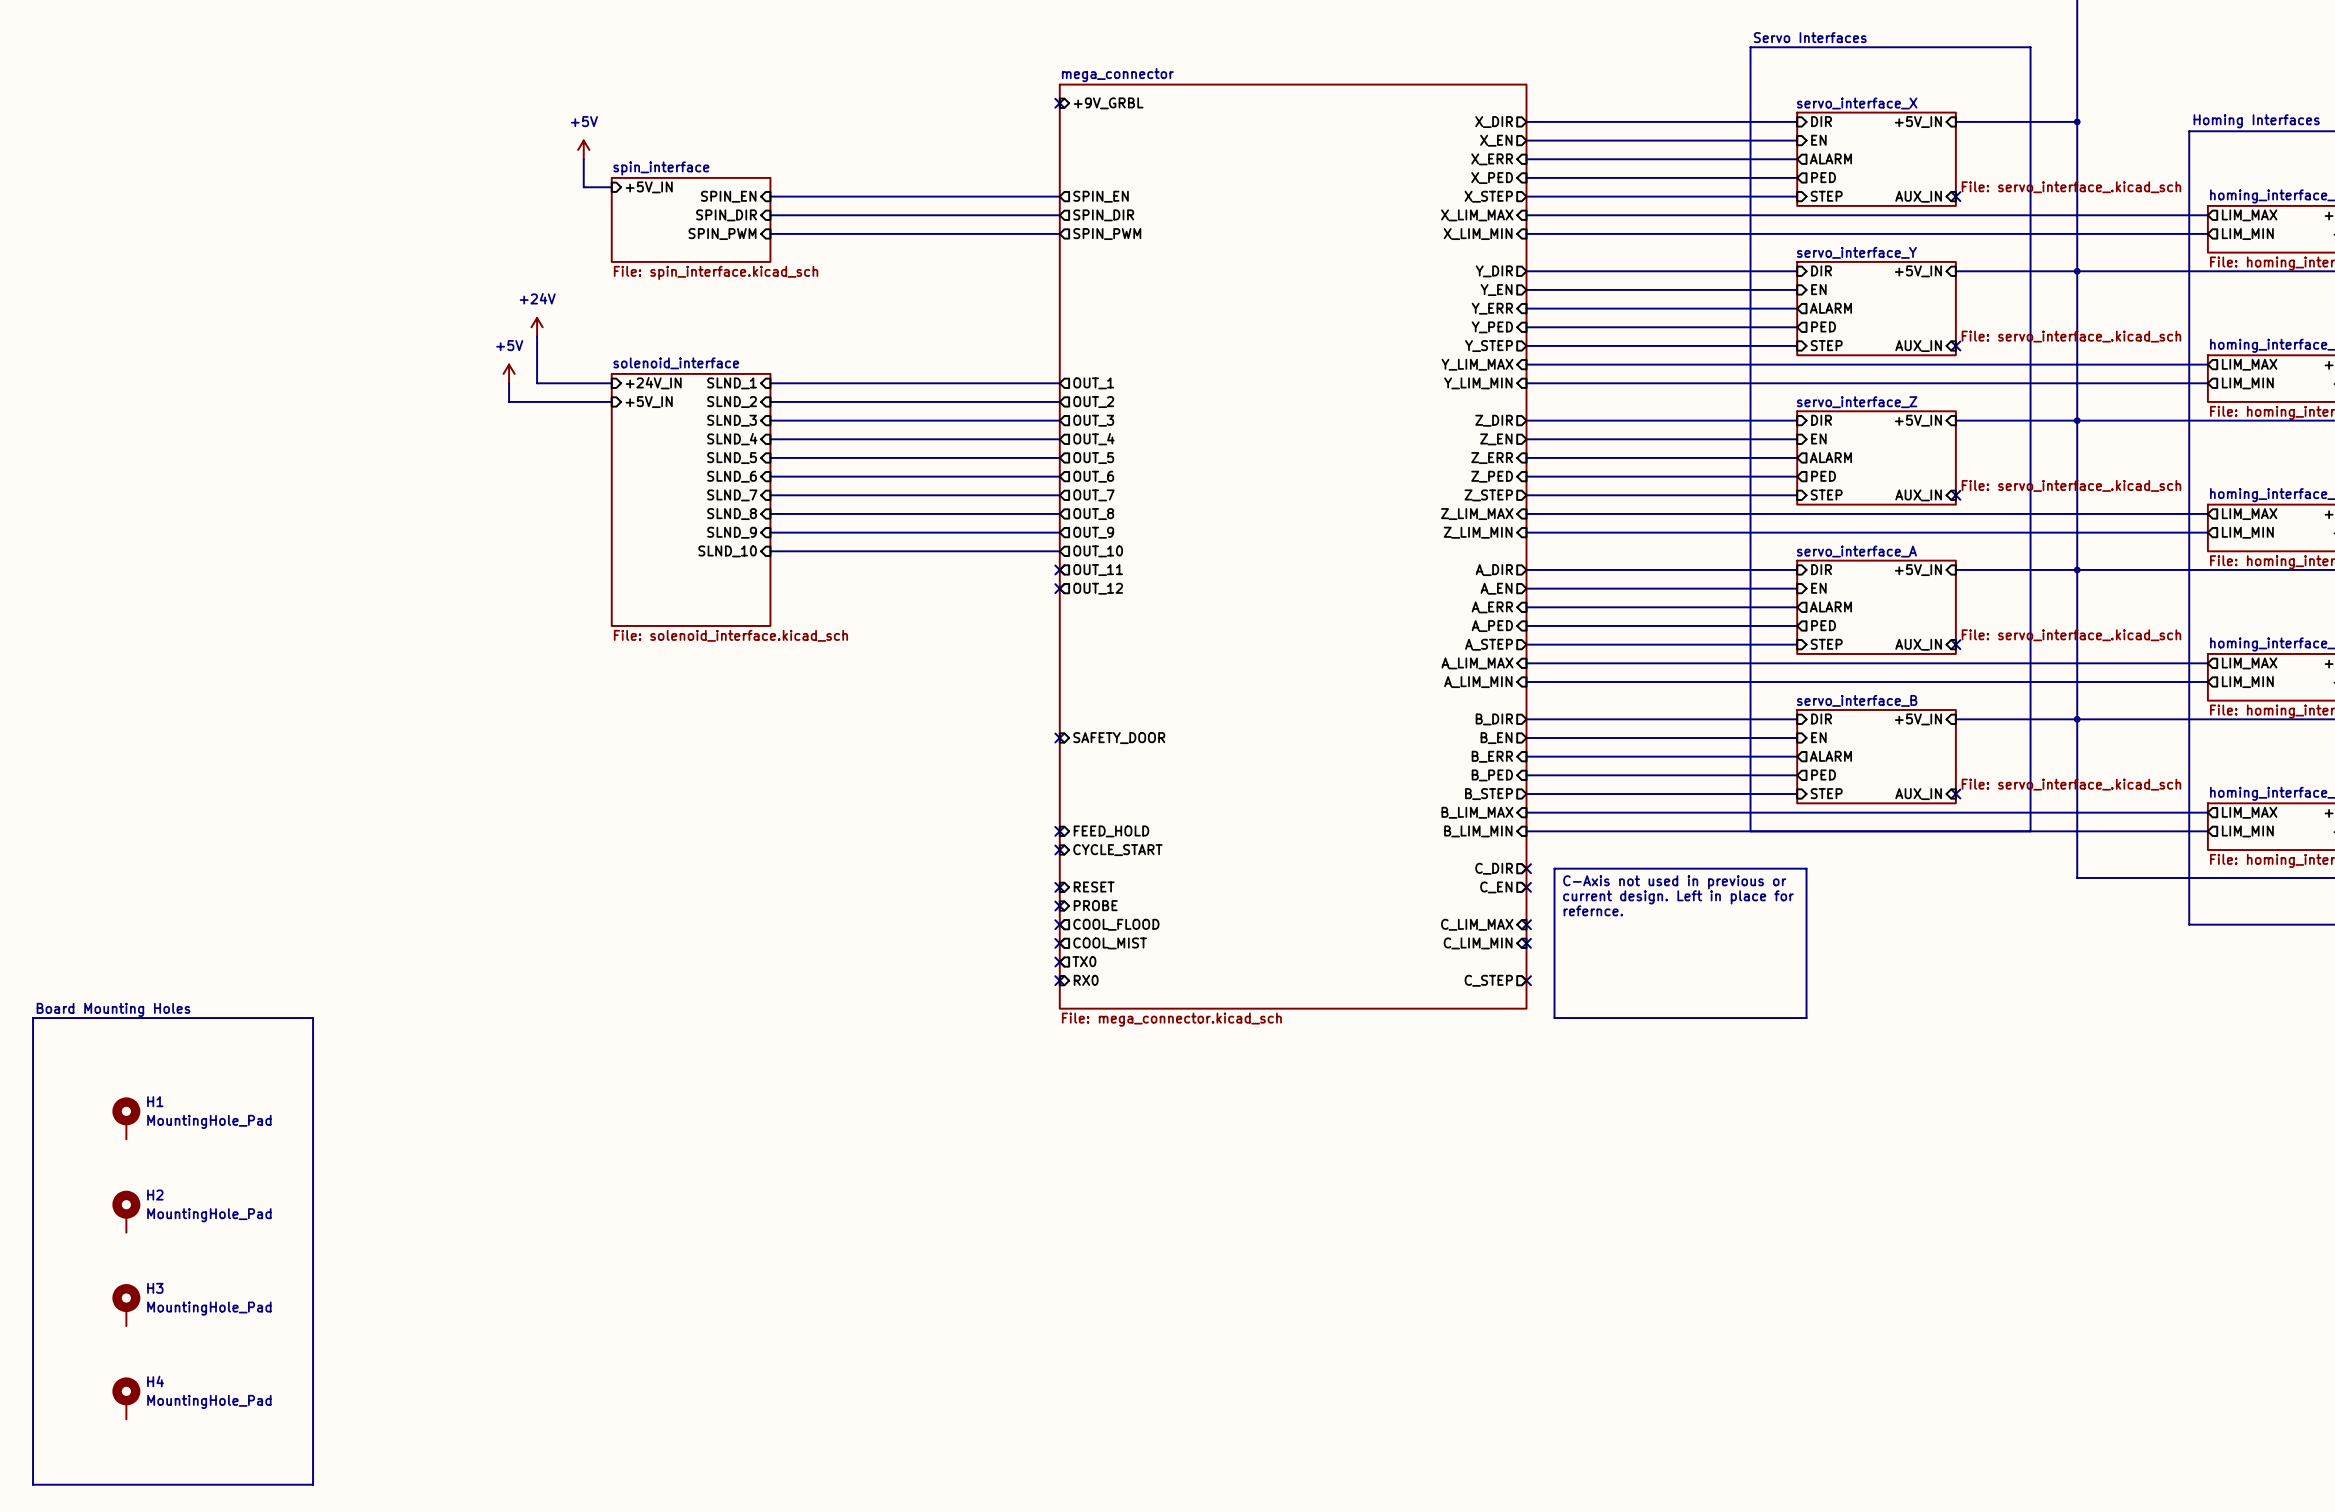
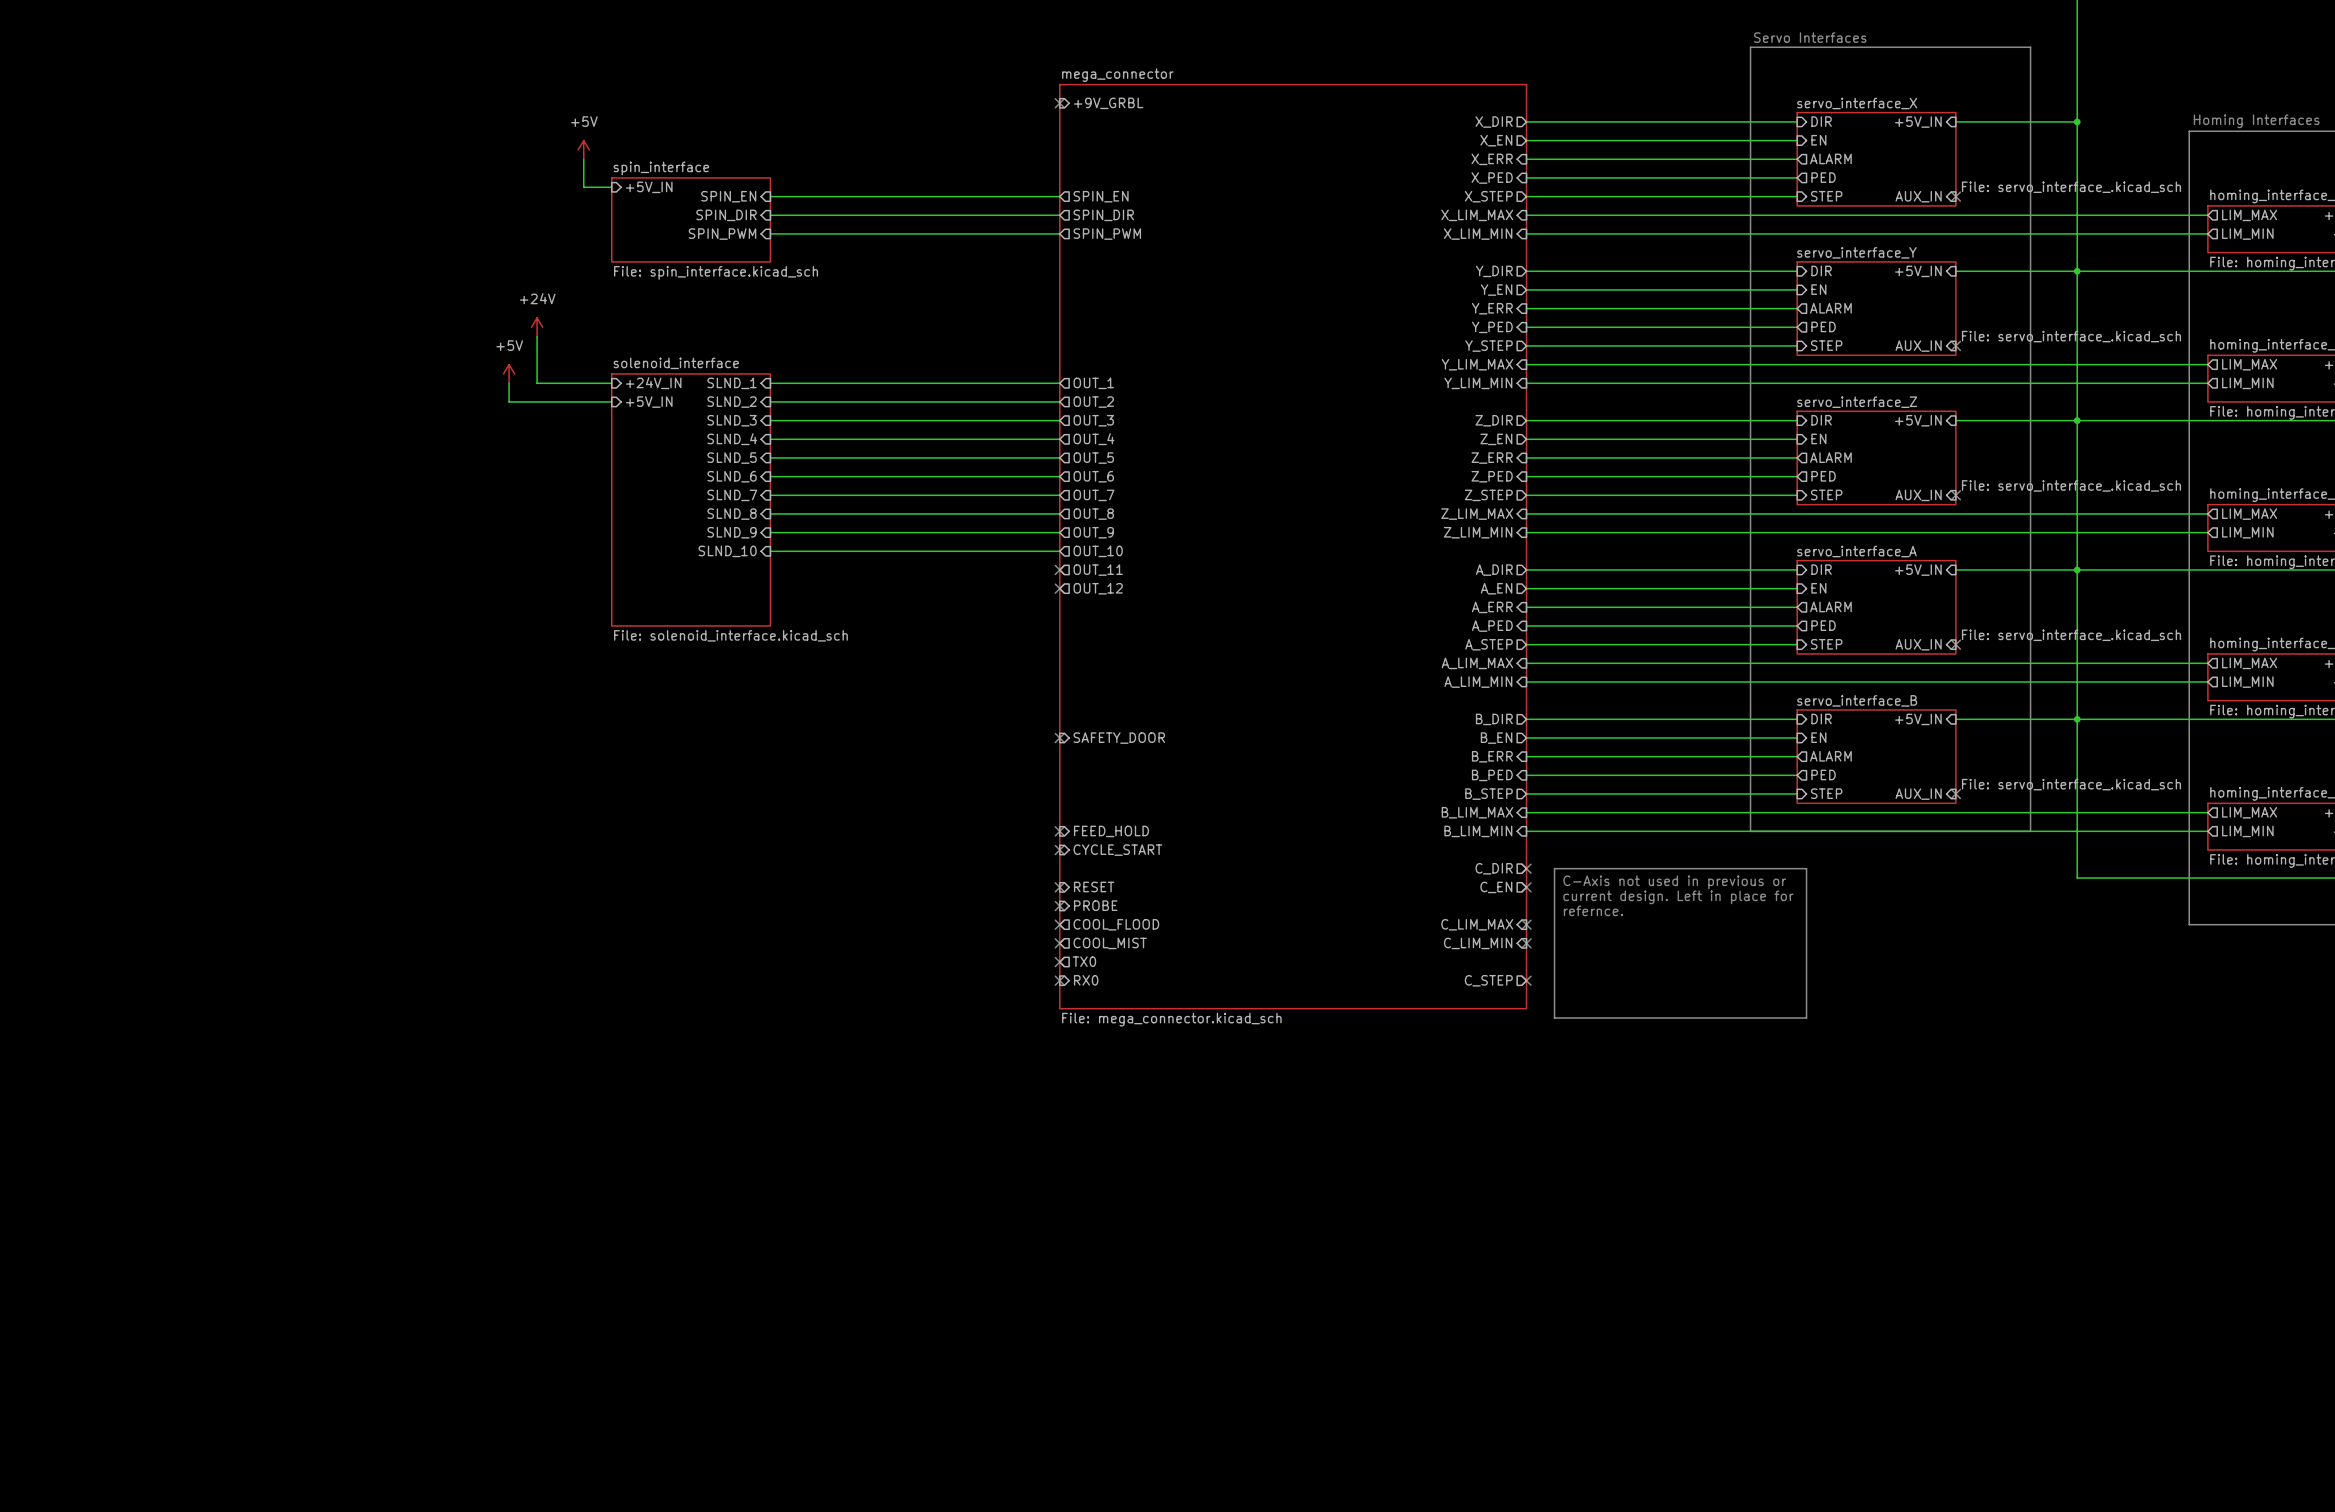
text: Board Mounting Holes (113, 1009) -> none
line: (33, 1018) (313, 1018) (313, 1484) (33, 1484) (33, 1018) -> none
H1: MountingHole_Pad (126, 1118) -> none
H2: MountingHole_Pad (126, 1211) -> none
H3: MountingHole_Pad (126, 1305) -> none
H4: MountingHole_Pad (126, 1398) -> none

